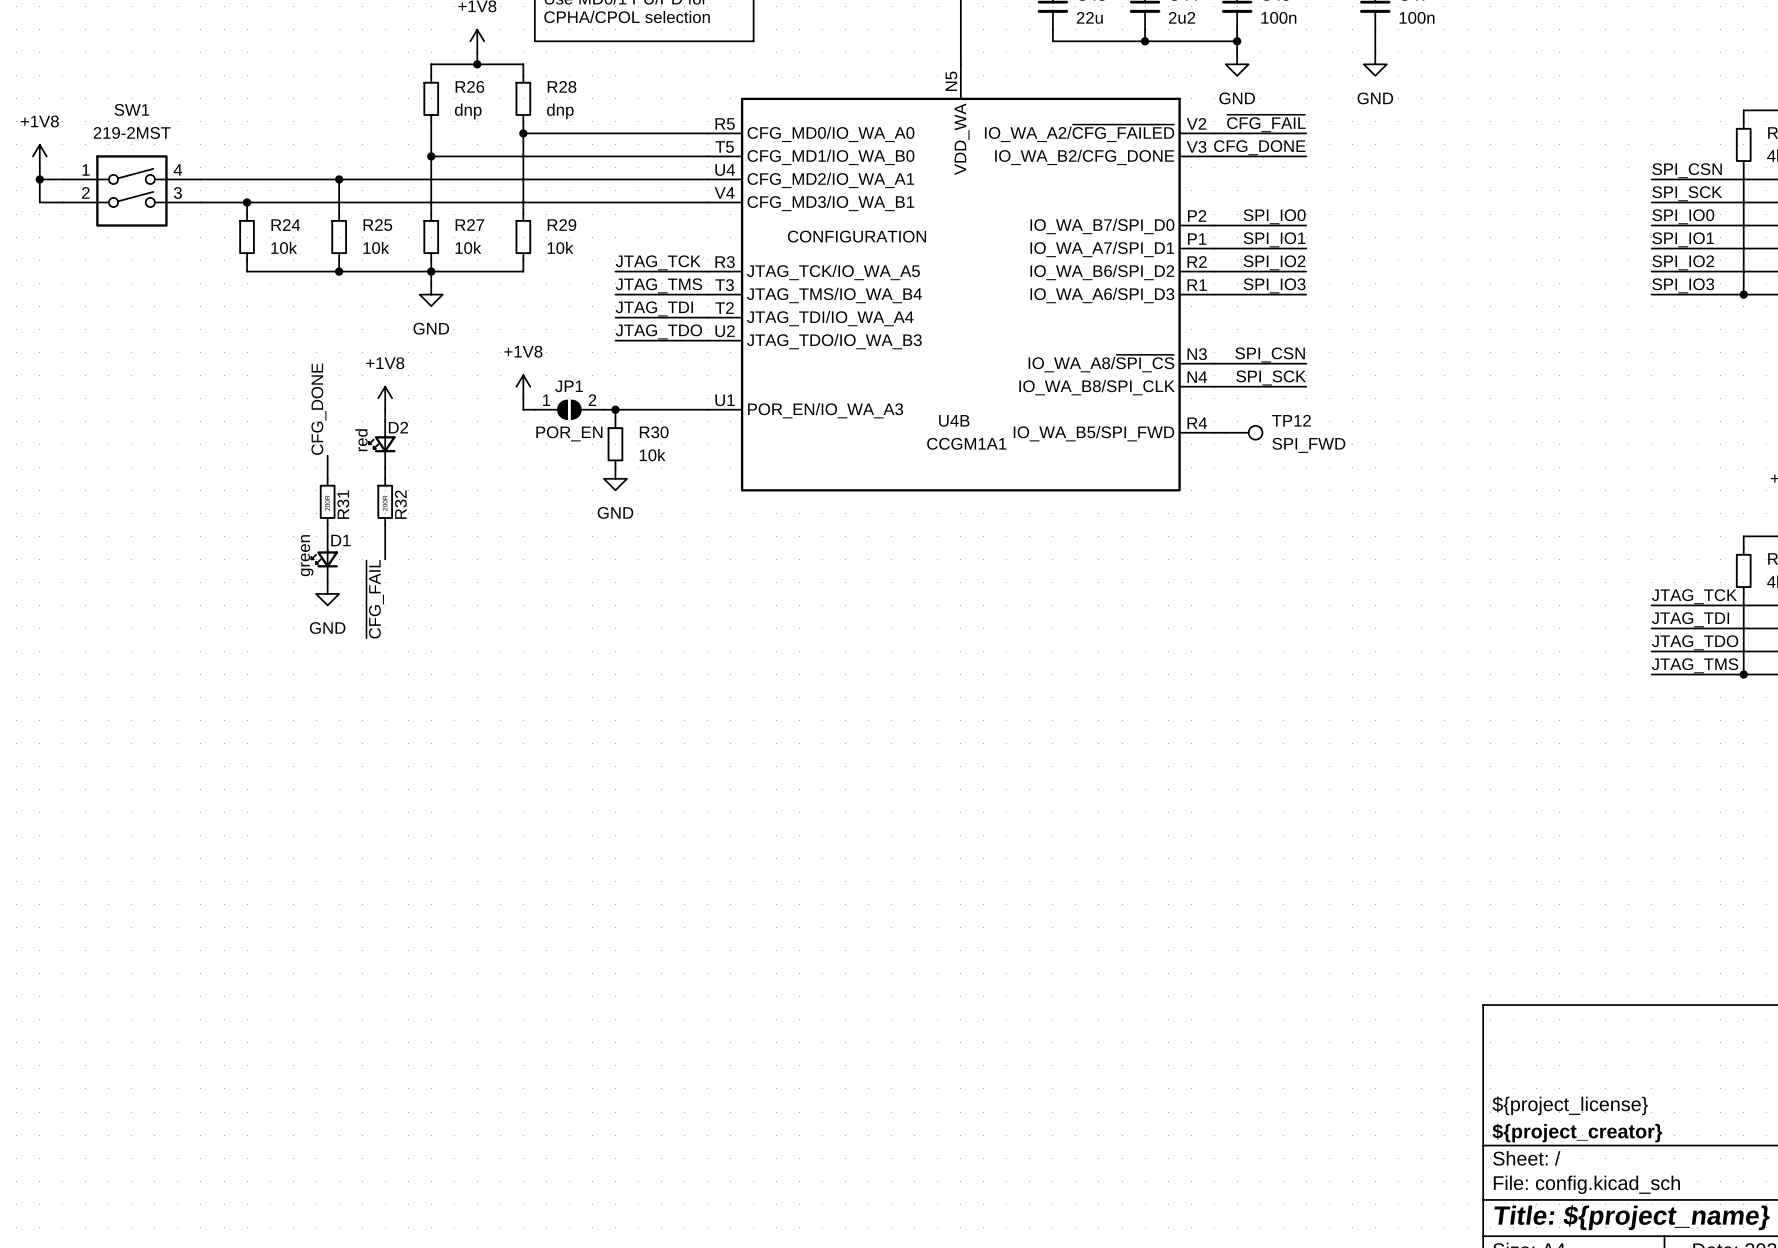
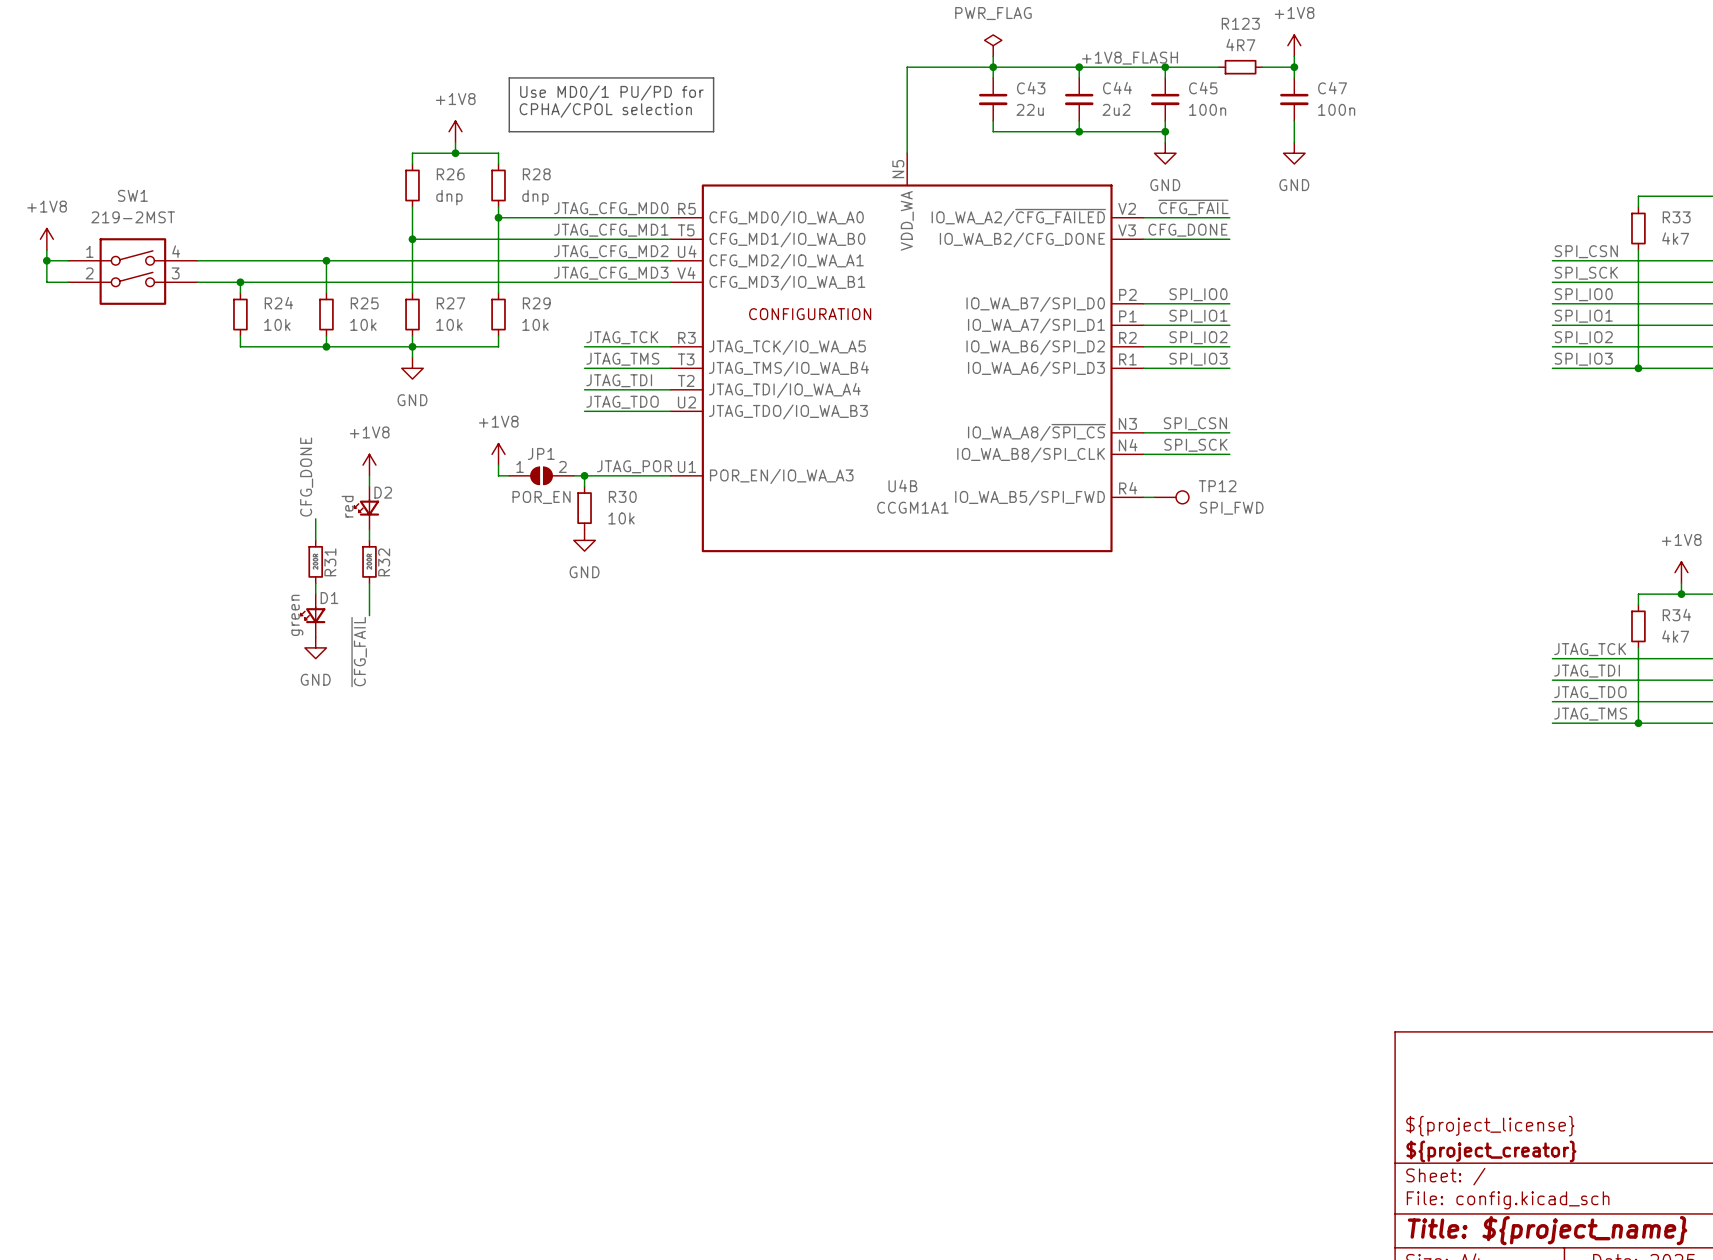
label: none -> JTAG_CFG_MD0 (611, 208)
label: none -> JTAG_CFG_MD1 (611, 230)
label: none -> JTAG_CFG_MD2 (611, 251)
label: none -> JTAG_CFG_MD3 (611, 273)
label: none -> JTAG_POR (634, 466)

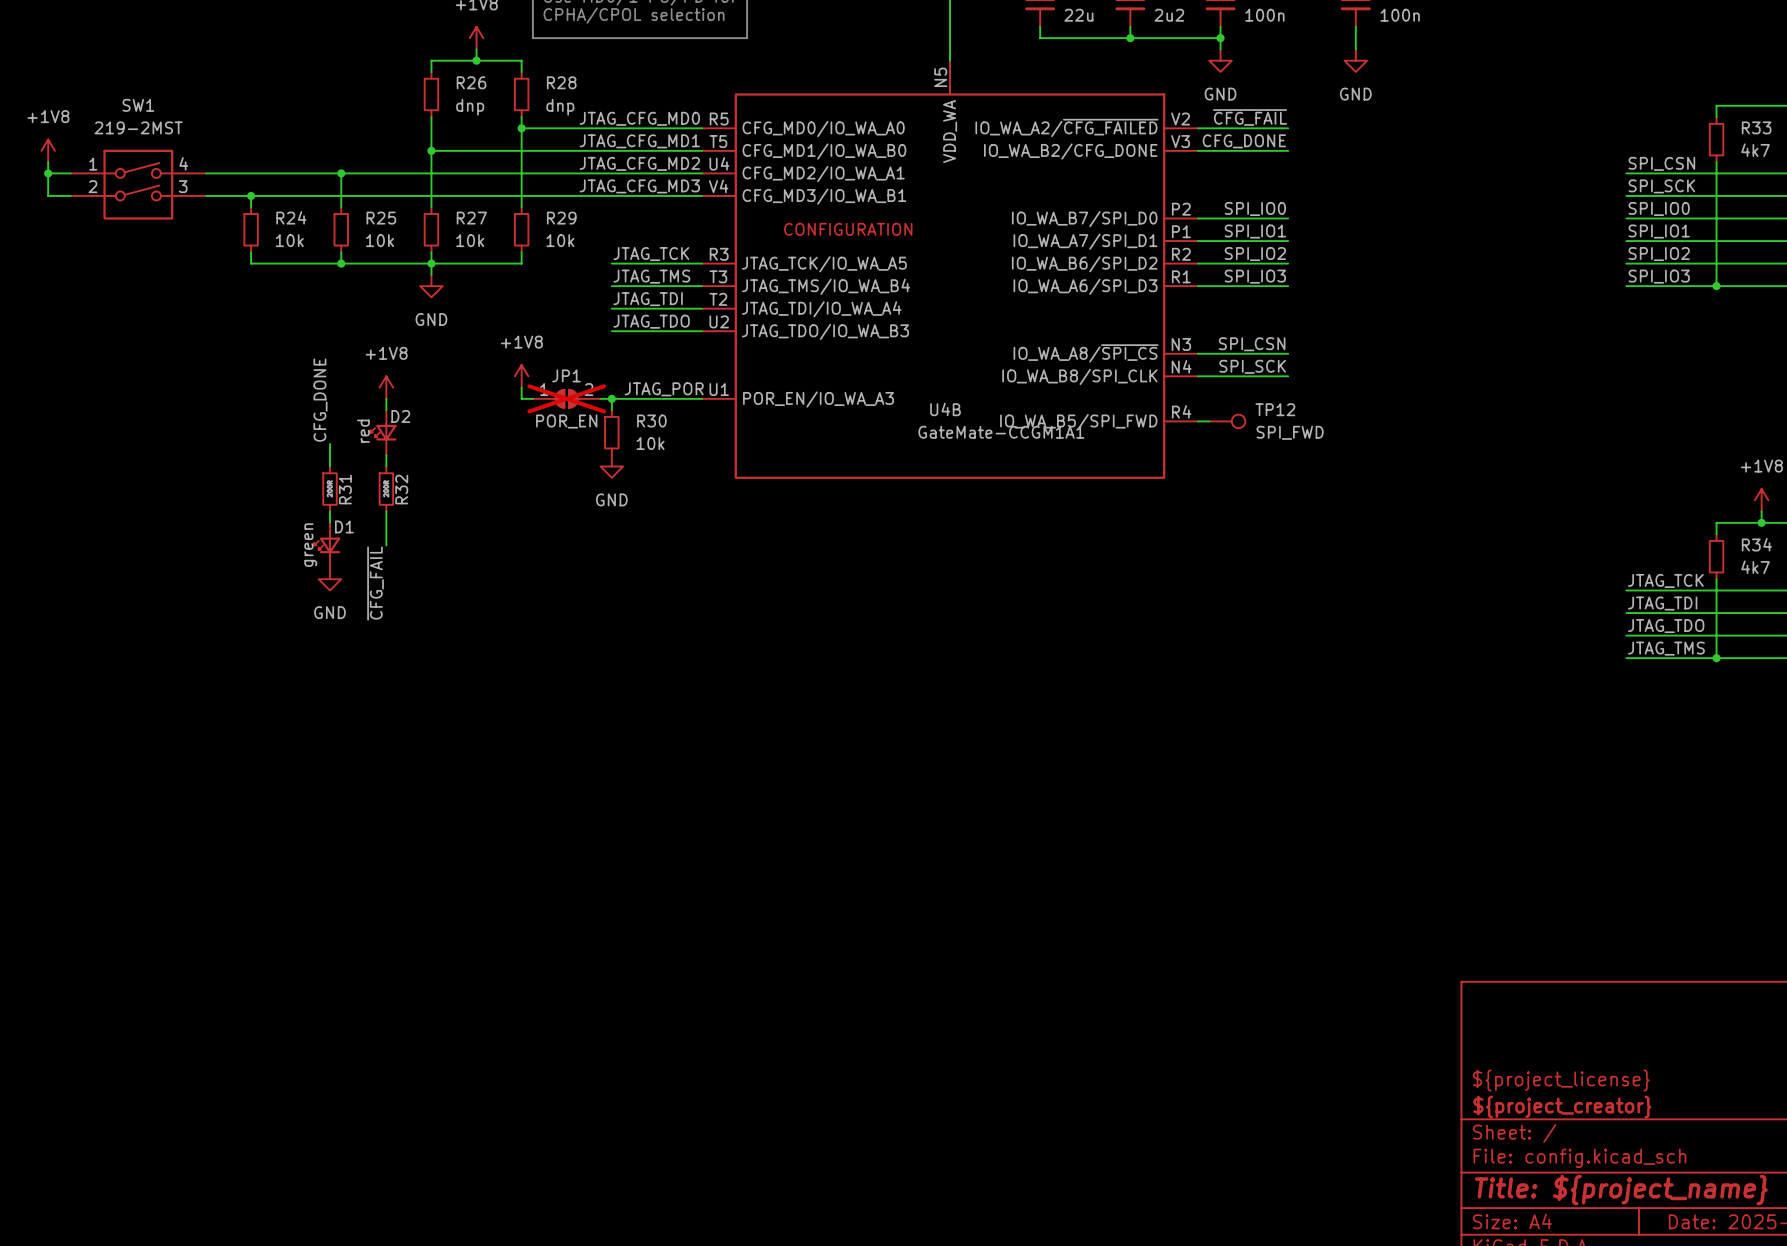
JP1 do-not-place cross: none -> (566, 398)
U4B value: CCGM1A1 (912, 507) -> GateMate-CCGM1A1 (1001, 432)

